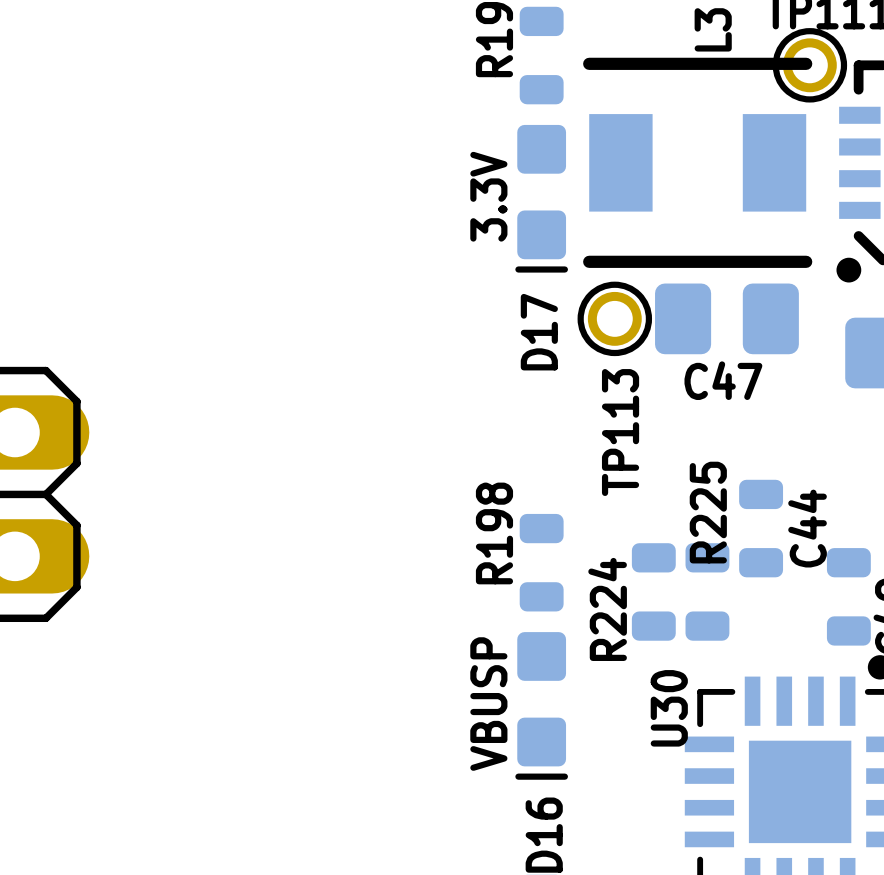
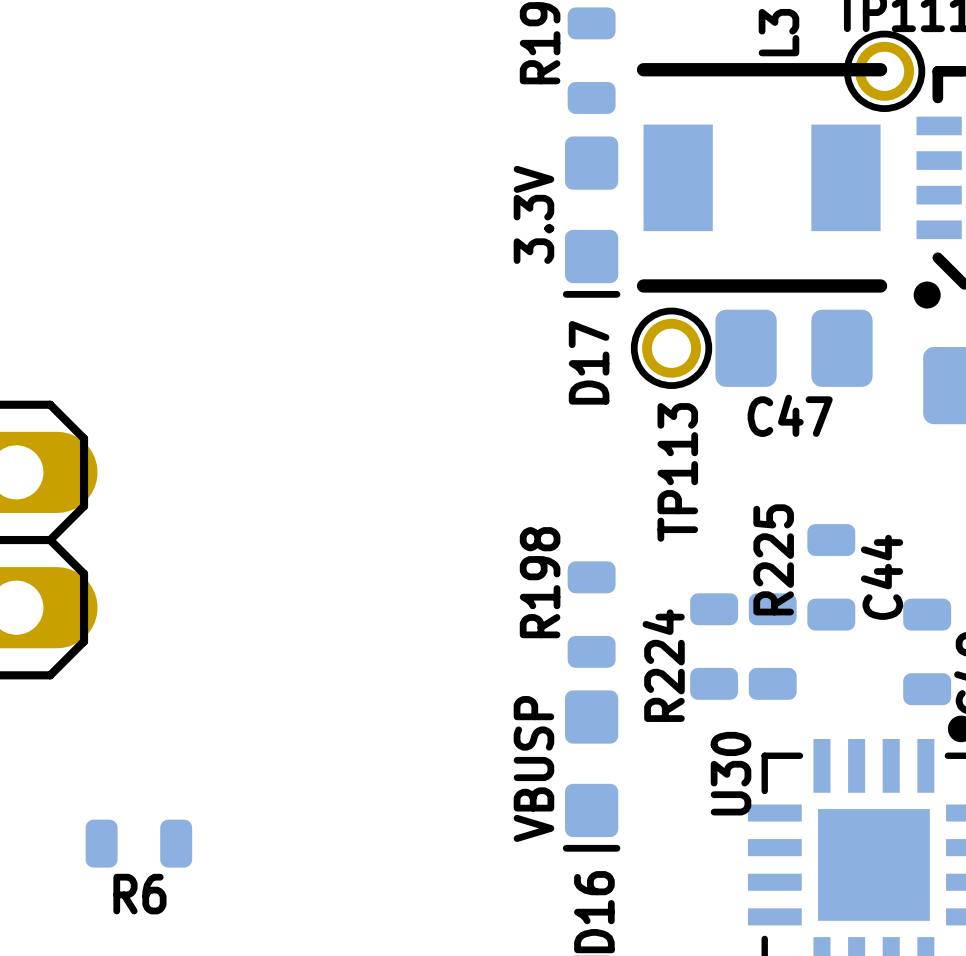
R6: none -> (138, 843)

